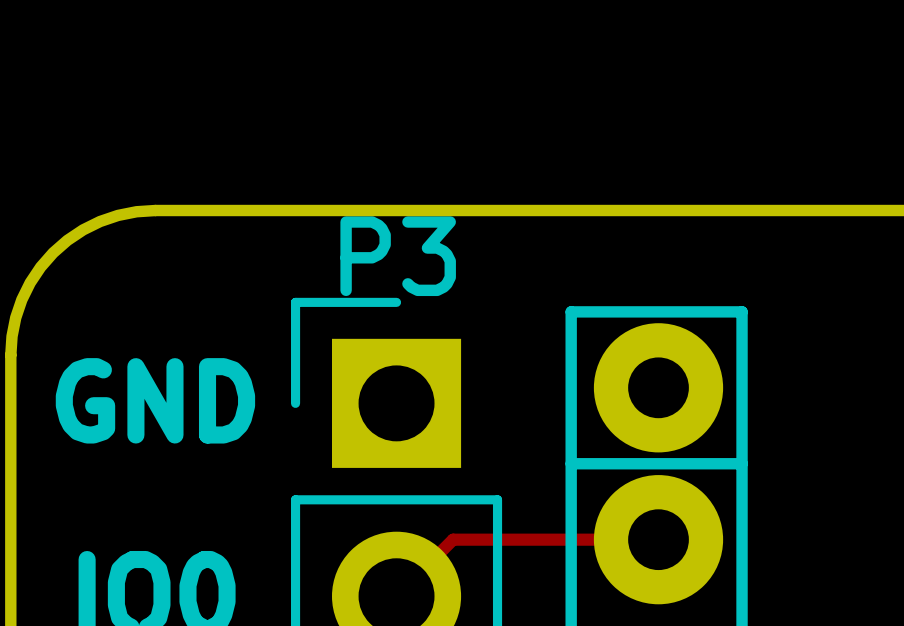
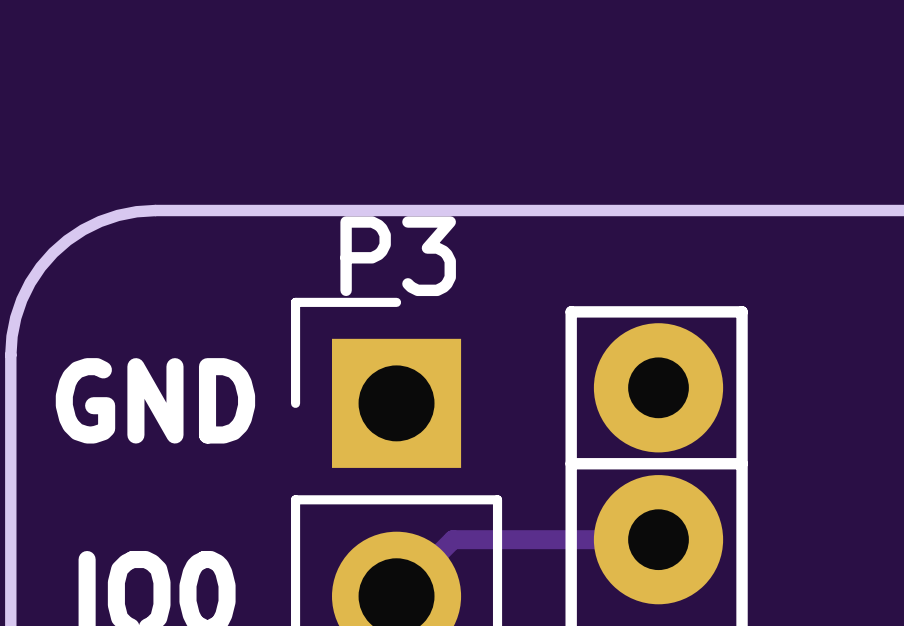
track width: thin (658, 539) (453, 539) (396, 596) -> thick (658, 539) (453, 539) (396, 596)

